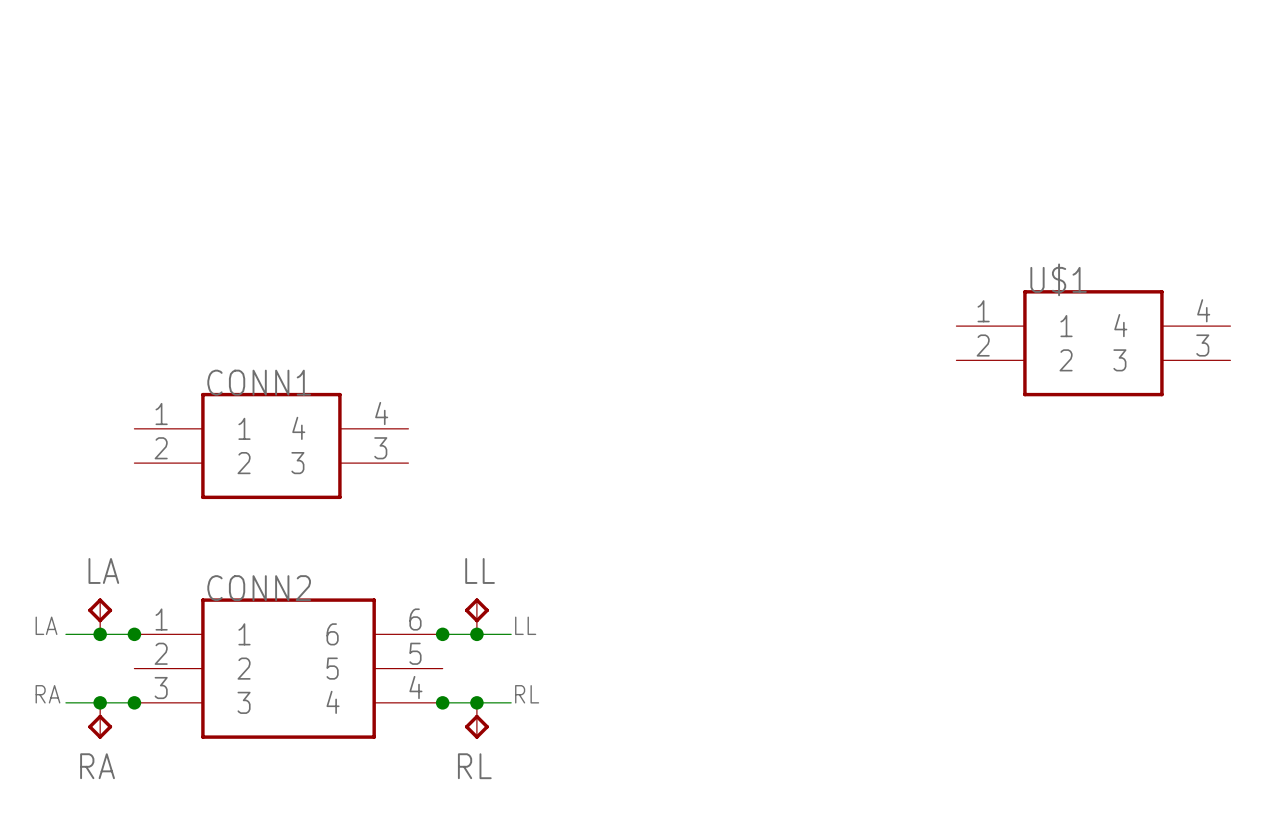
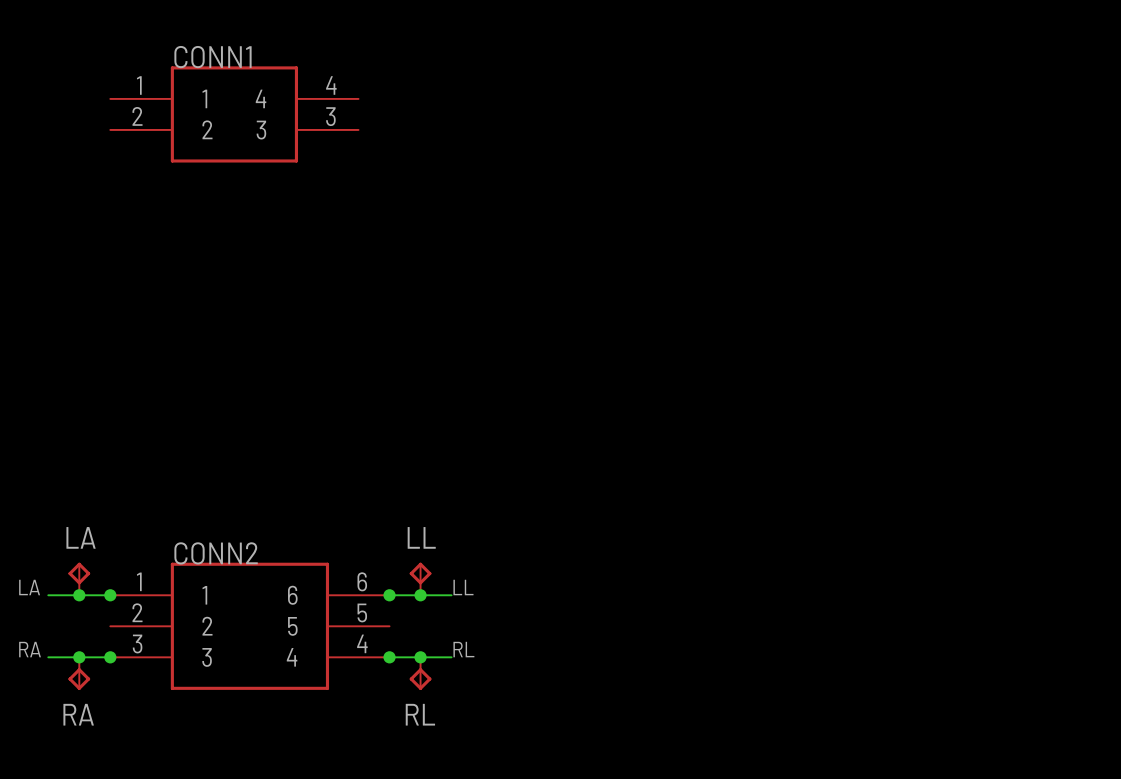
U$1: (1093, 343) -> none
CONN1 position: (271, 445) -> (234, 114)

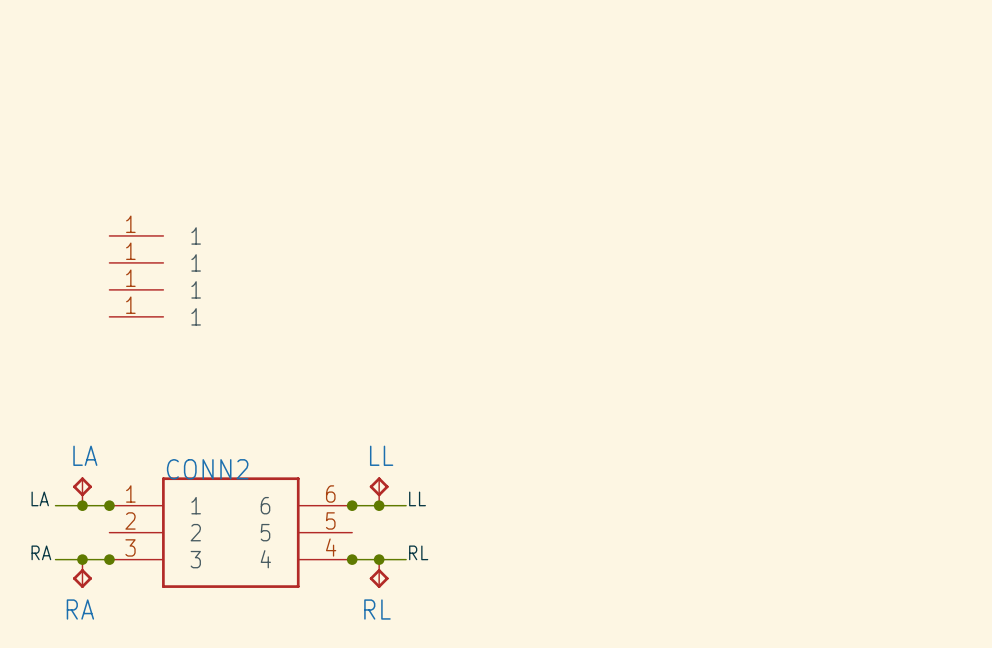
CONN1: (234, 114) -> none
part: none -> (136, 235)
part: none -> (136, 262)
part: none -> (136, 289)
part: none -> (136, 316)

